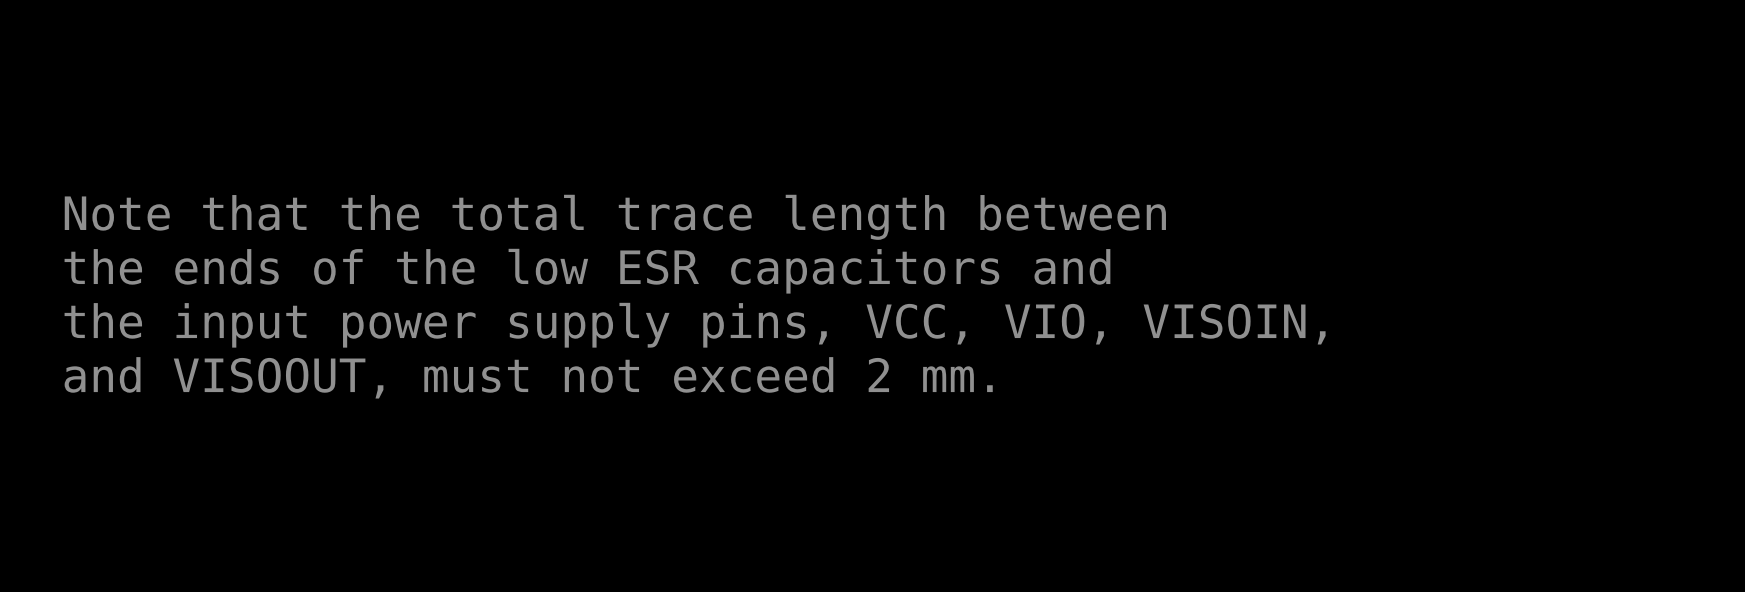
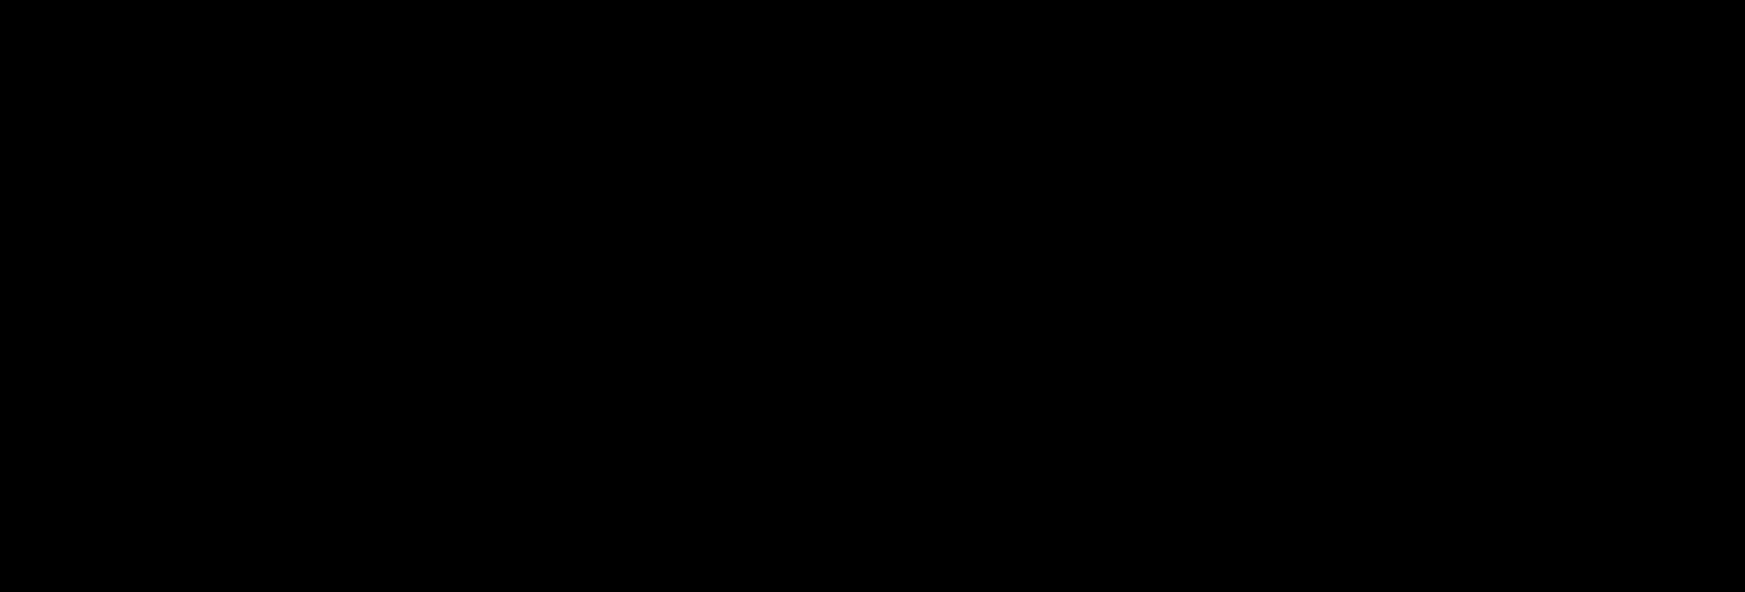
text: Note that the total trace length between (615, 217) -> none
text: the ends of the low ESR capacitors and (587, 271) -> none
text: the input power supply pins, VCC, VIO, VISOIN, (695, 325) -> none
text: and VISOOUT, must not exceed 2 mm. (528, 377) -> none

